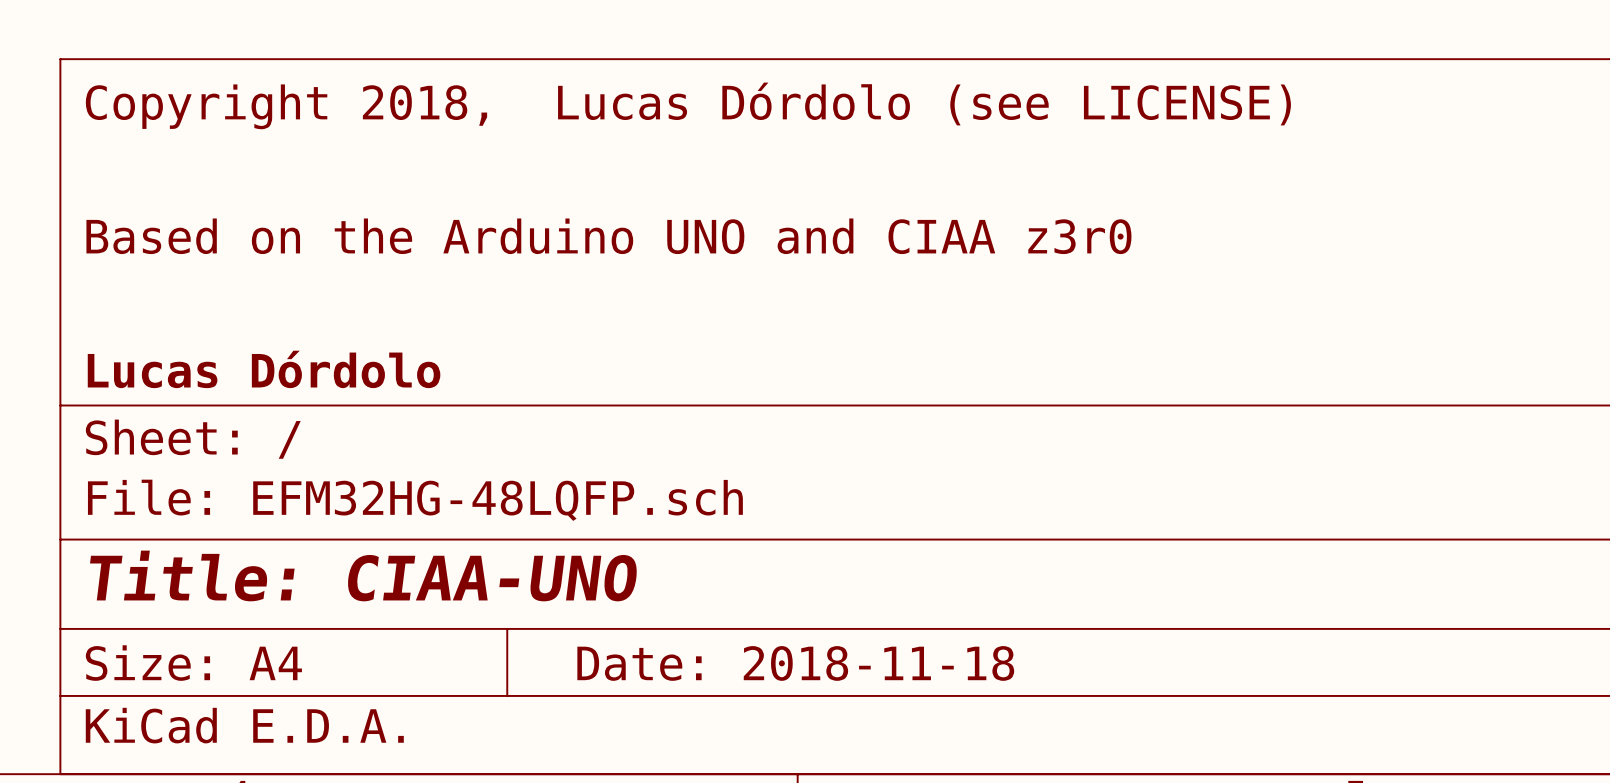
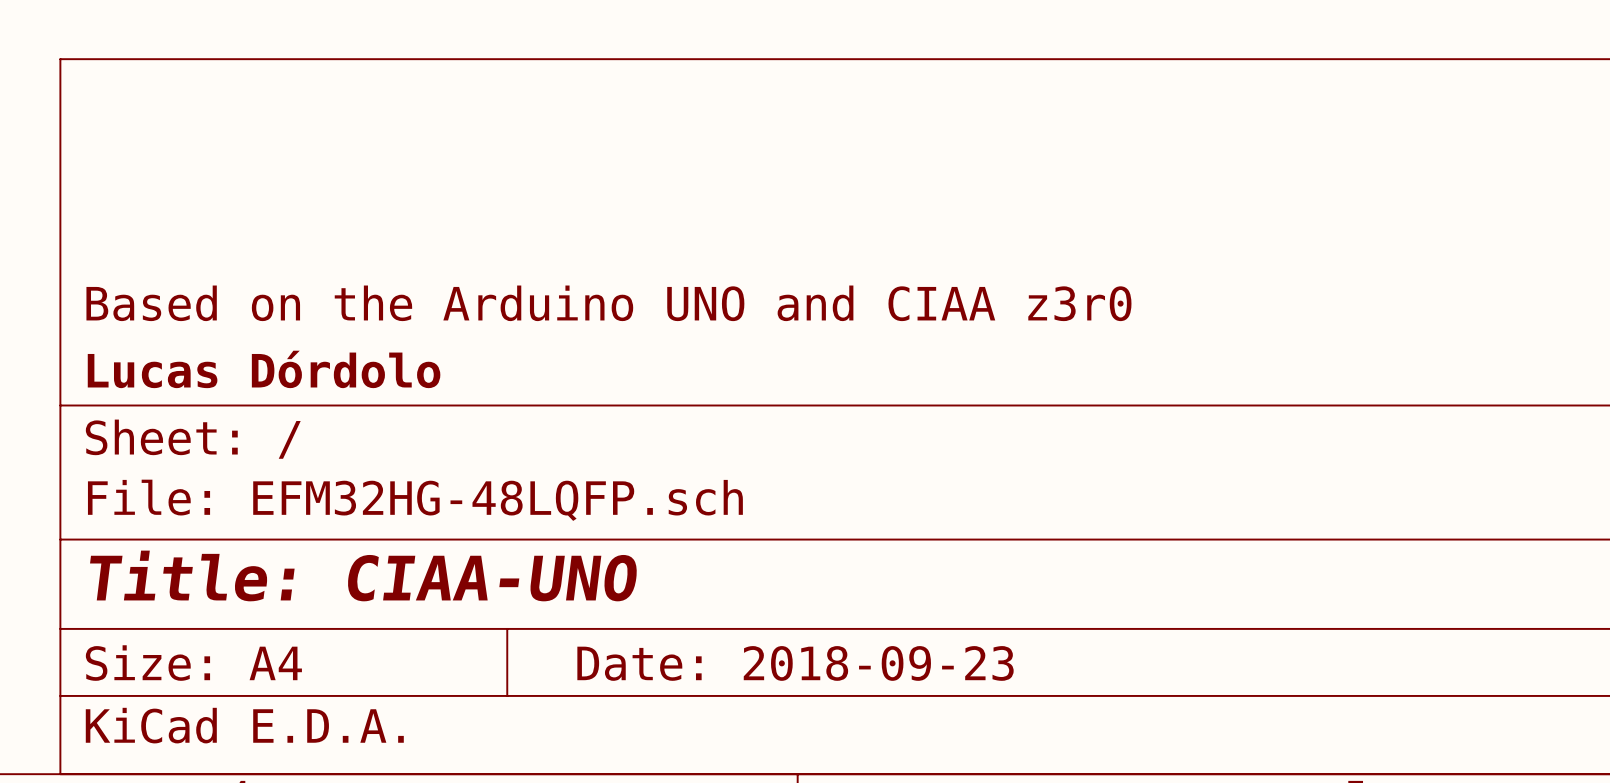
title block: Copyright 2018, Lucas Dórdolo (see LICENSE) (688, 105) -> none
title block position: Based on the Arduino UNO and CIAA z3r0 (608, 236) -> Based on the Arduino UNO and CIAA z3r0 (608, 303)
title block: Date: 2018-11-18 (795, 663) -> Date: 2018-09-23 (795, 663)

